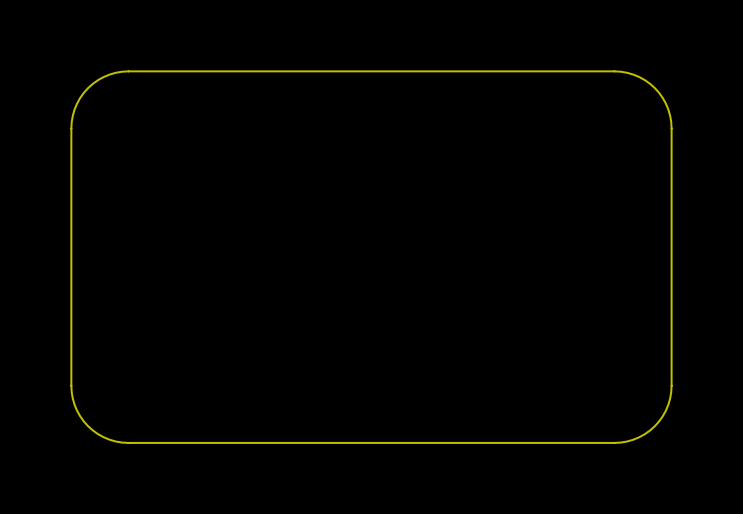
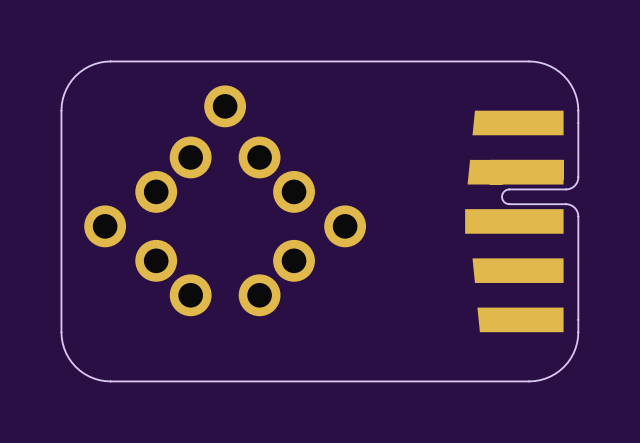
board edge: (671, 142) (671, 371) -> none
part: none -> (225, 200)
part: none -> (522, 221)

